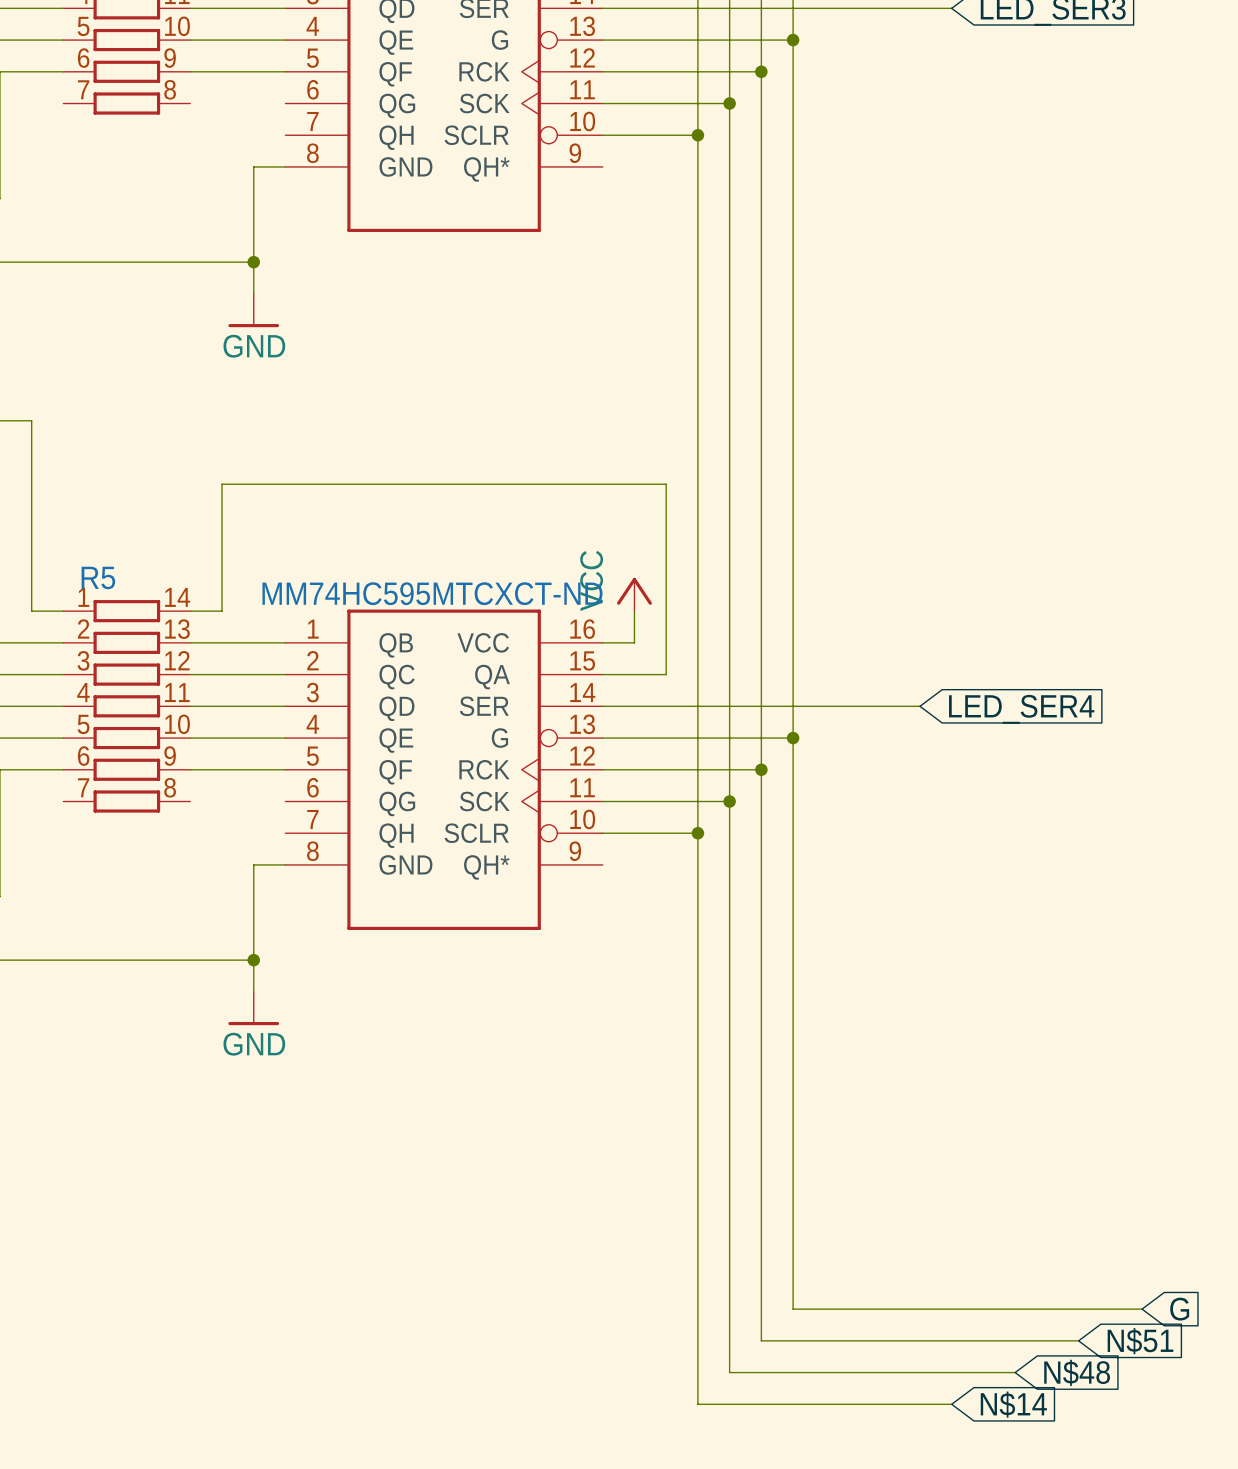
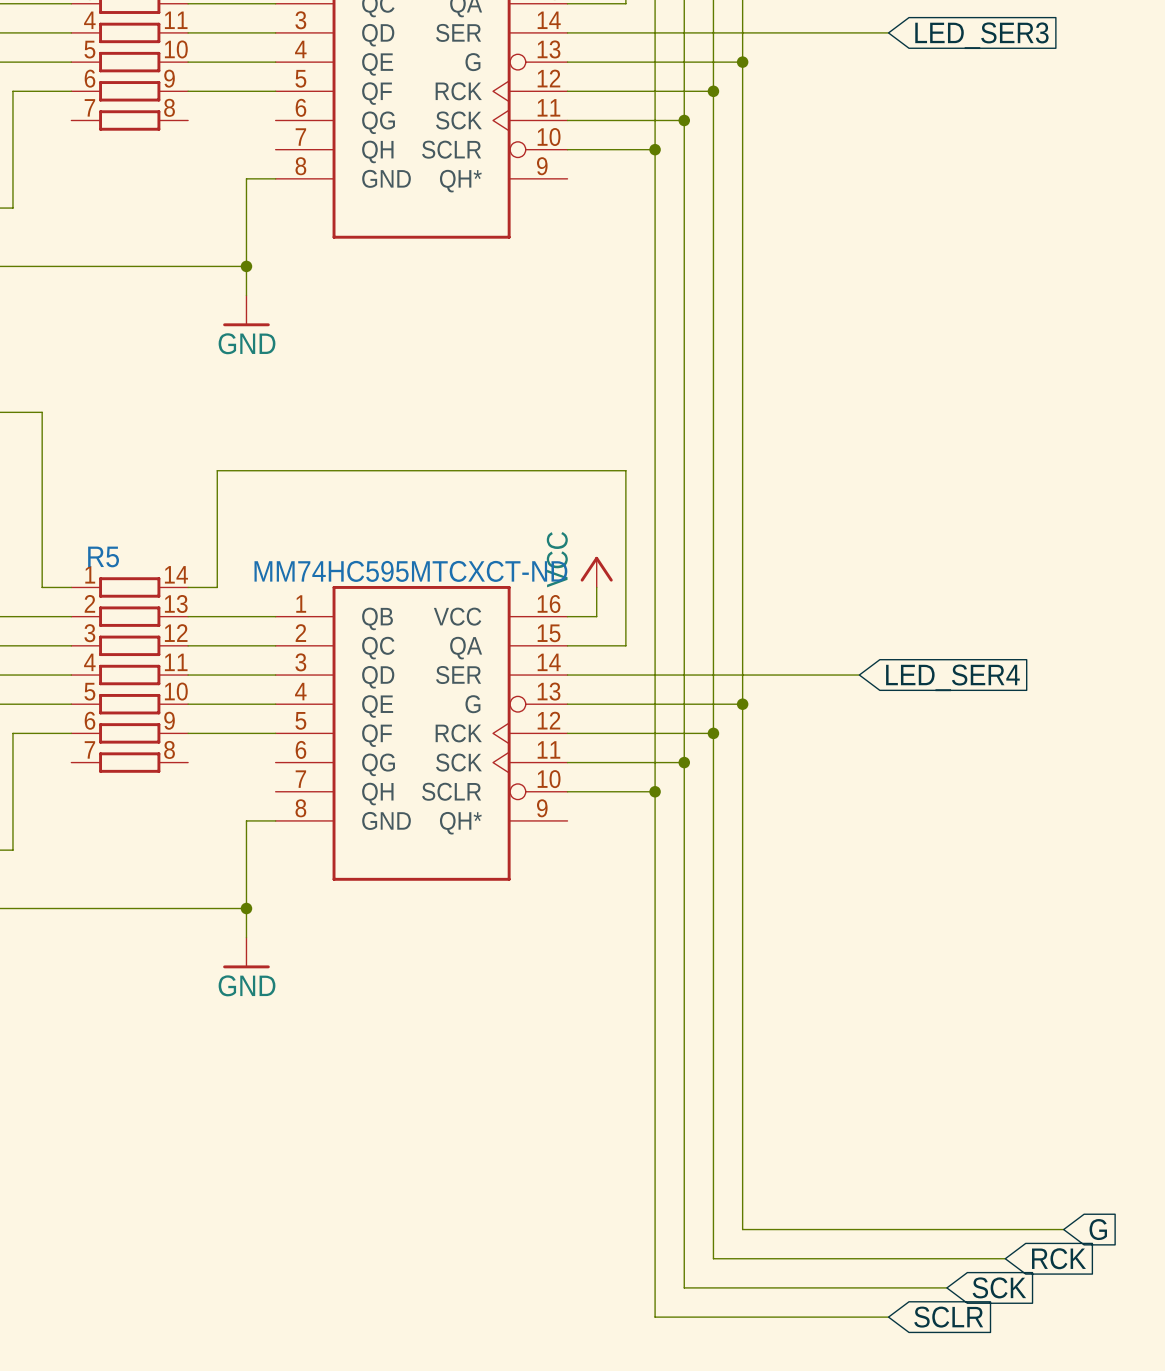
global label: N$51 (1140, 1341) -> RCK (1058, 1258)
global label: N$48 (1077, 1372) -> SCK (999, 1287)
global label: N$14 (1013, 1404) -> SCLR (948, 1317)

